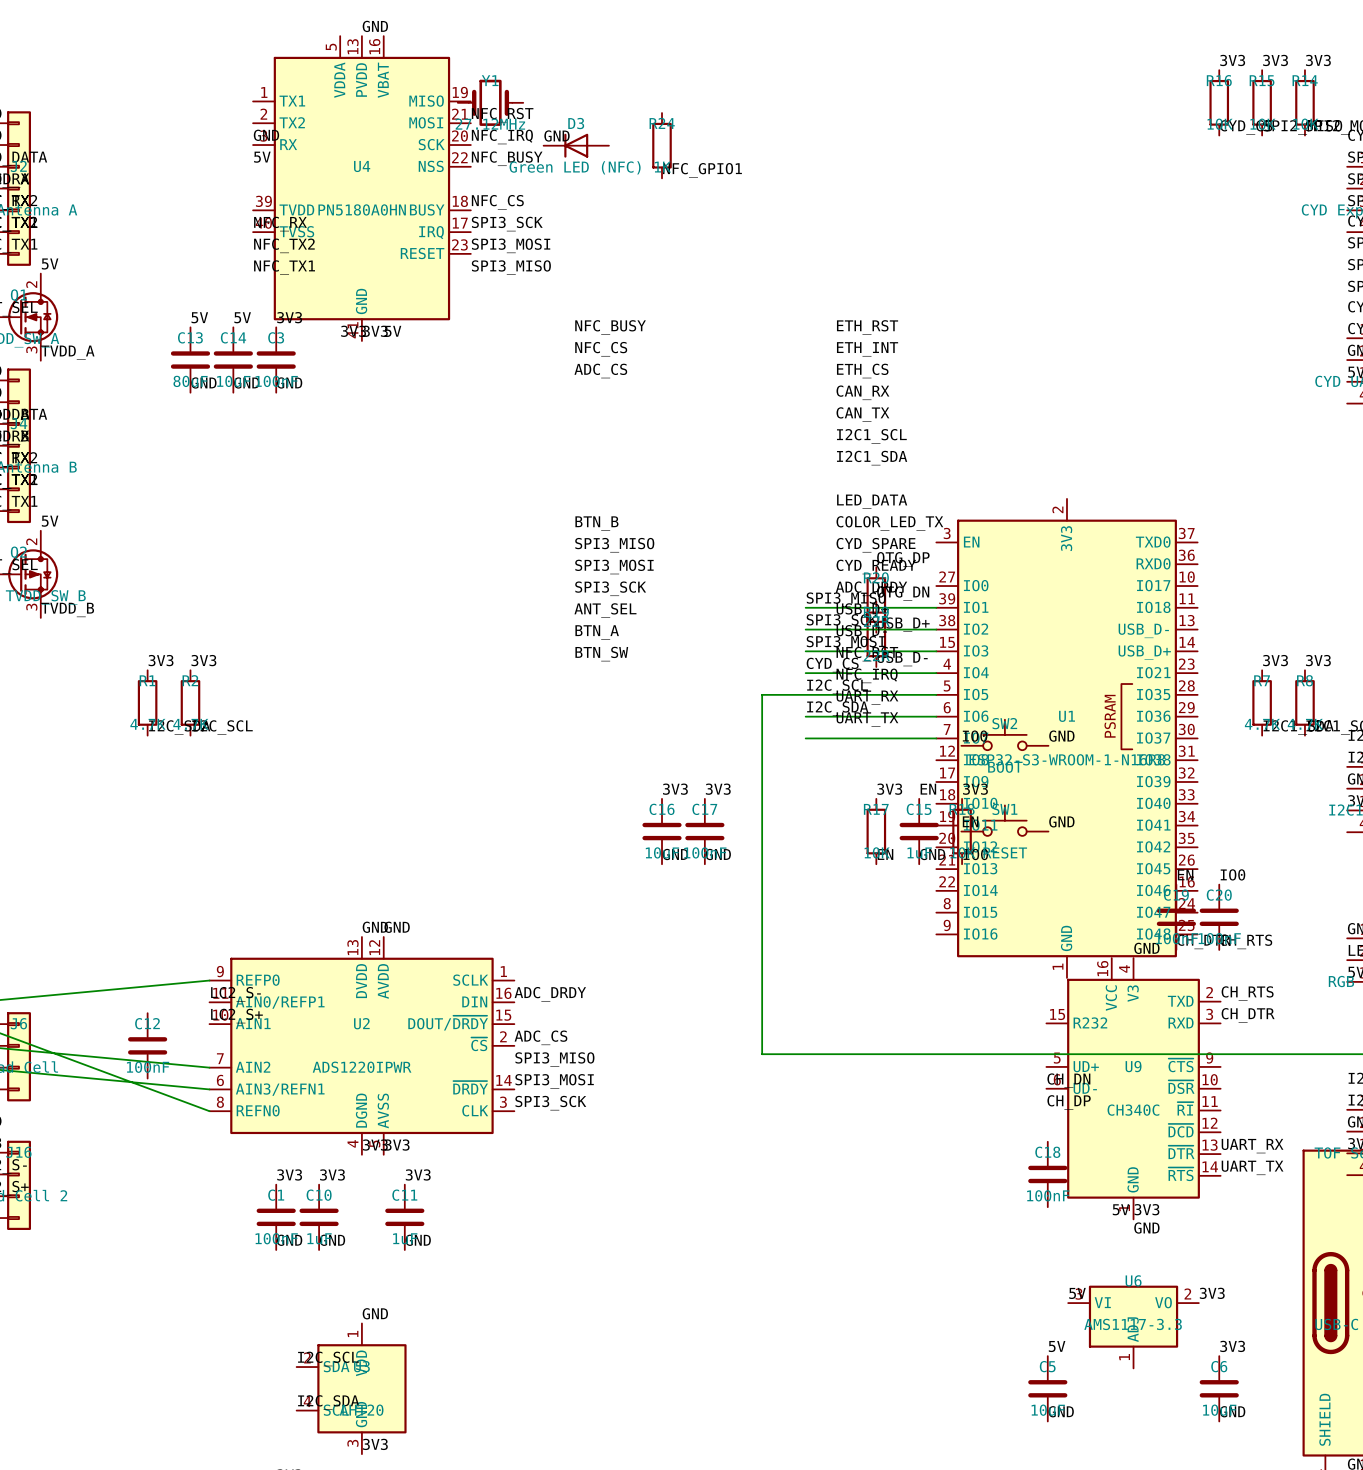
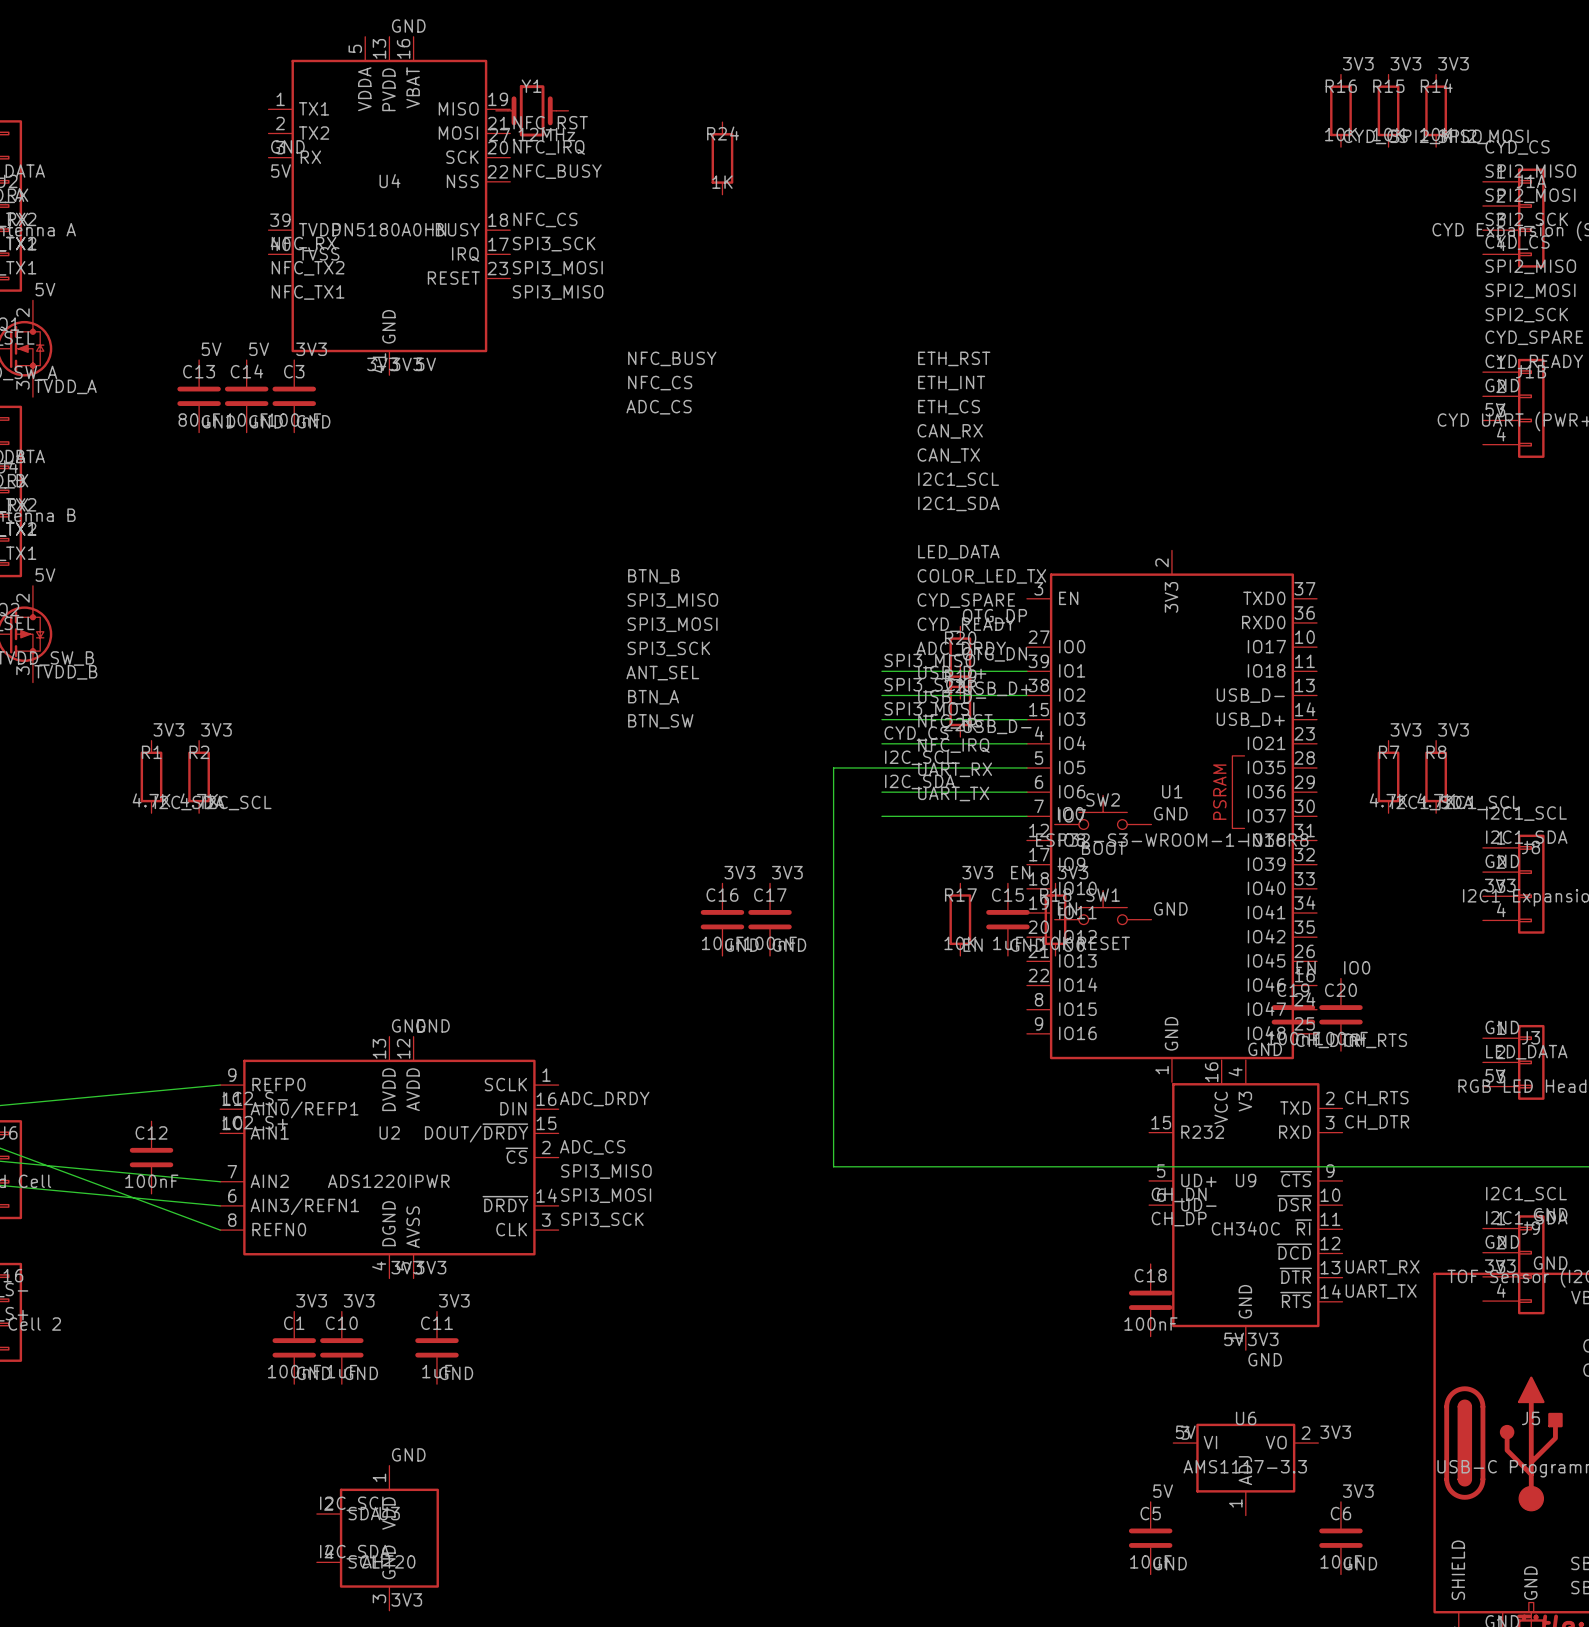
label: GND (557, 135) -> none
D3: Green LED (NFC) (576, 145) -> none
label: NFC_GPIO1 (702, 170) -> none

